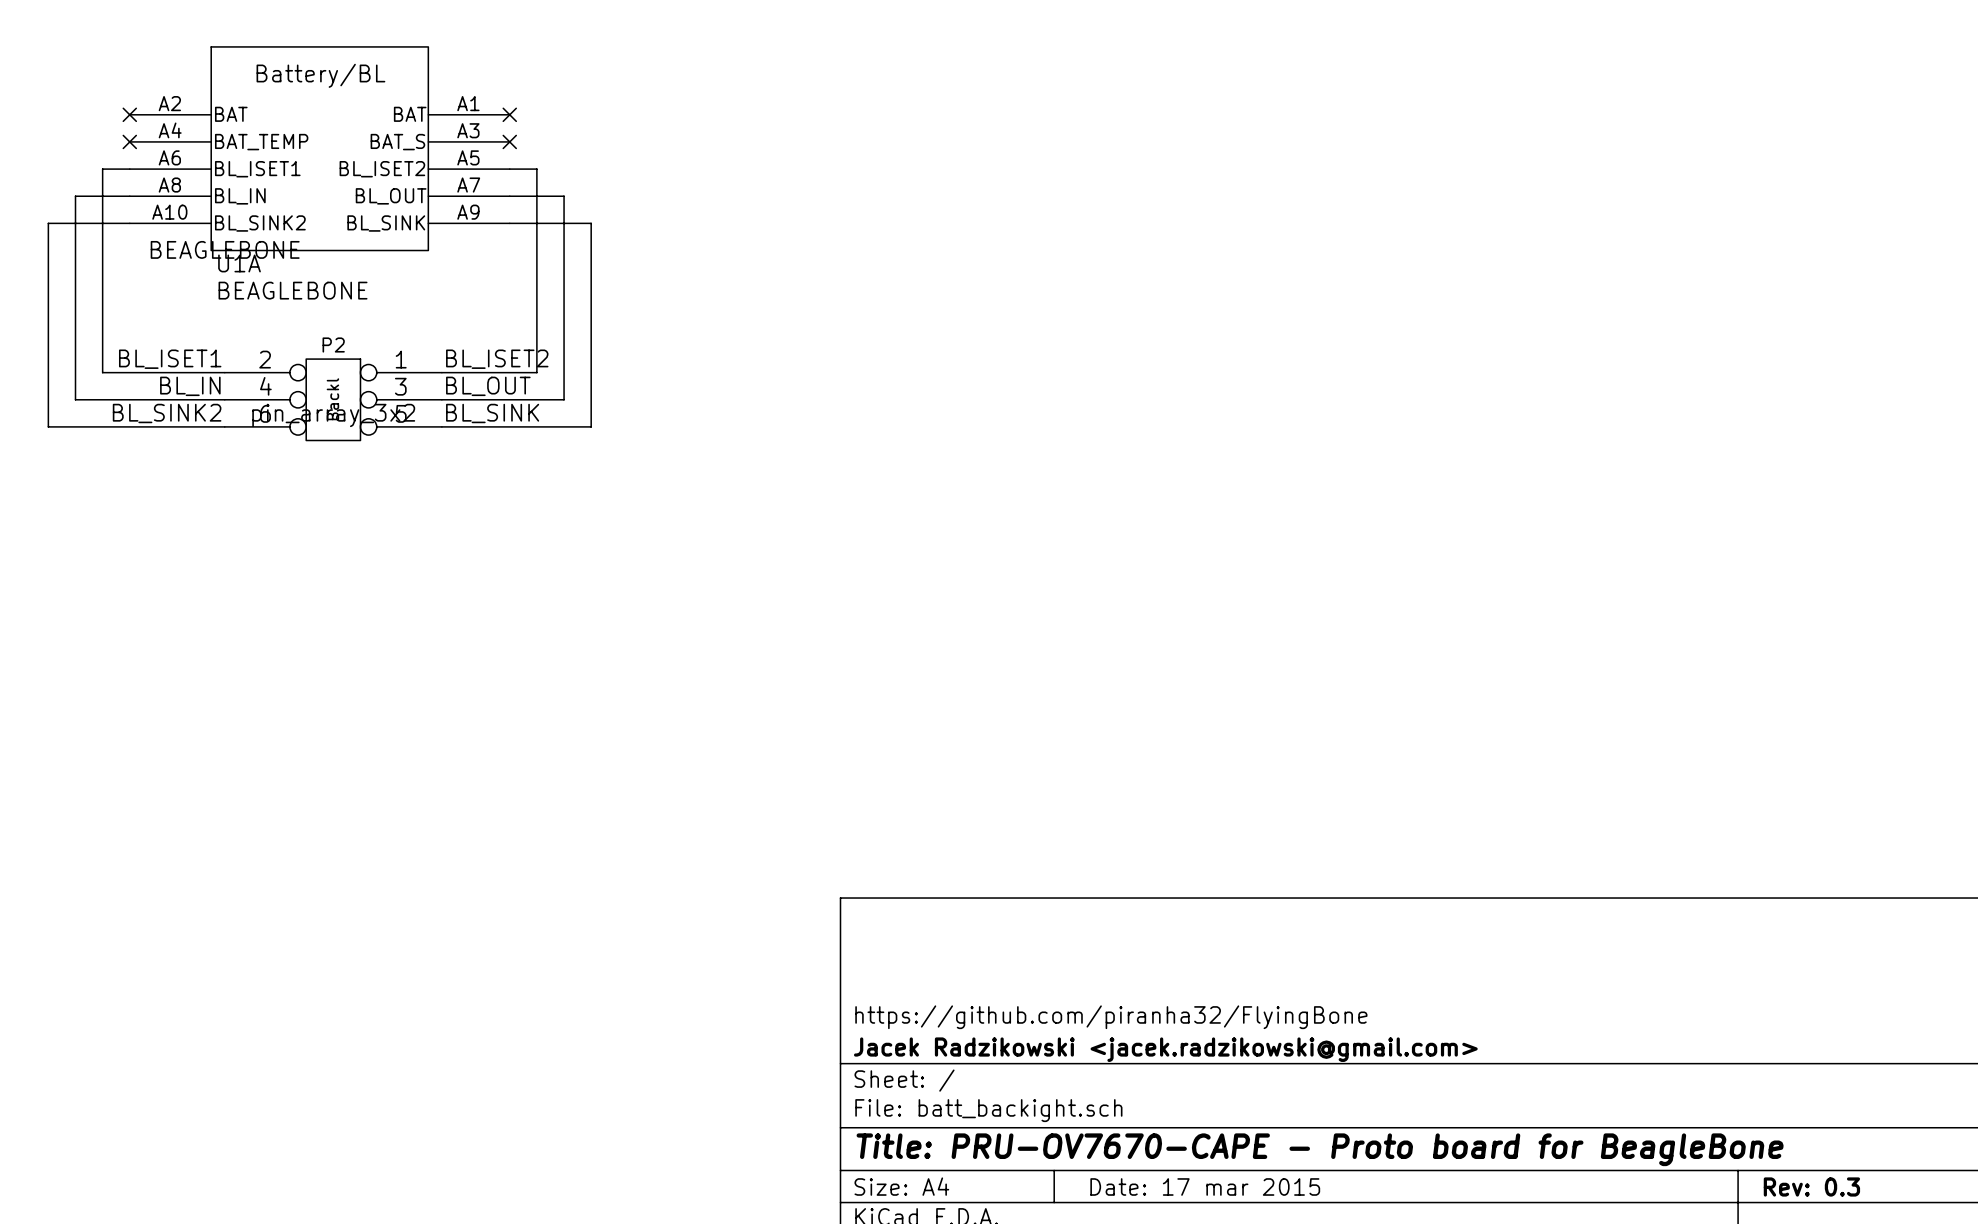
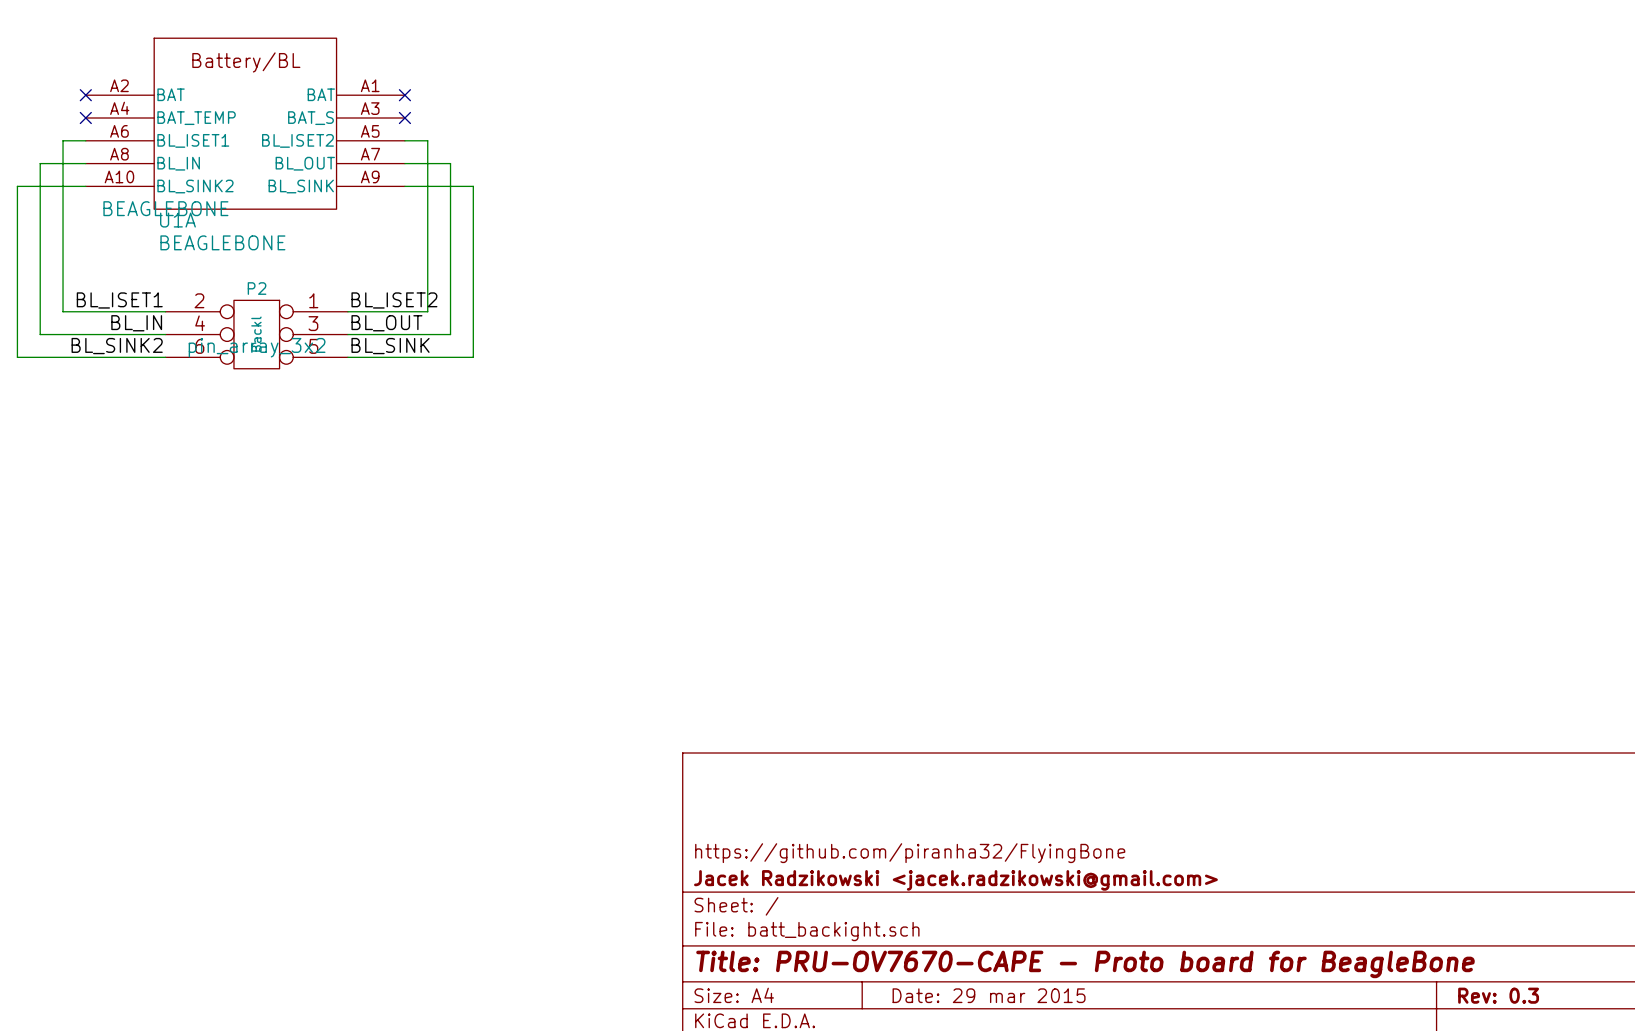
title block: Date: 17 mar 2015 (1205, 1186) -> Date: 29 mar 2015 (989, 995)

